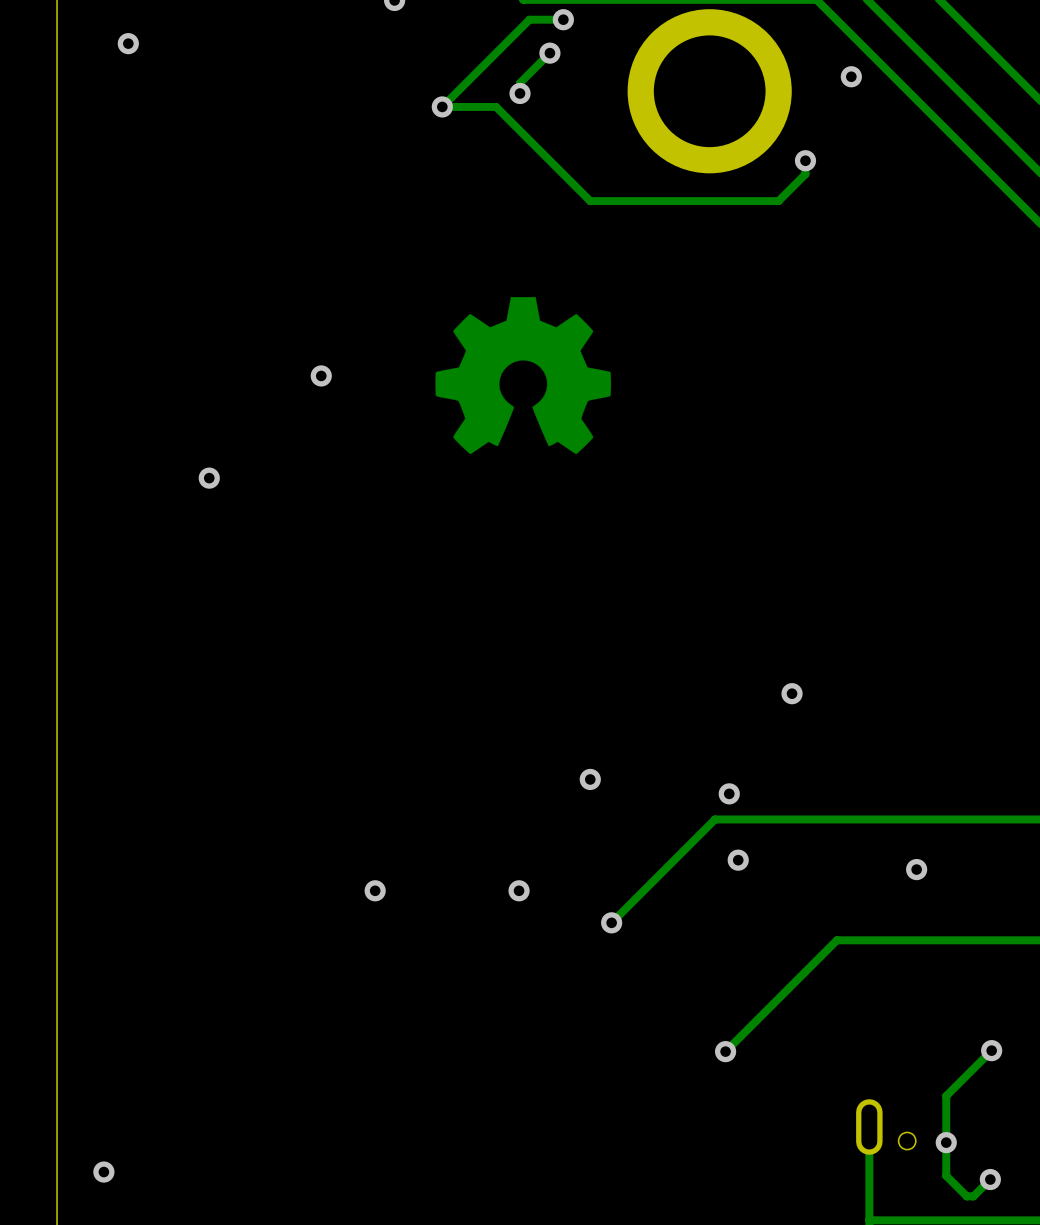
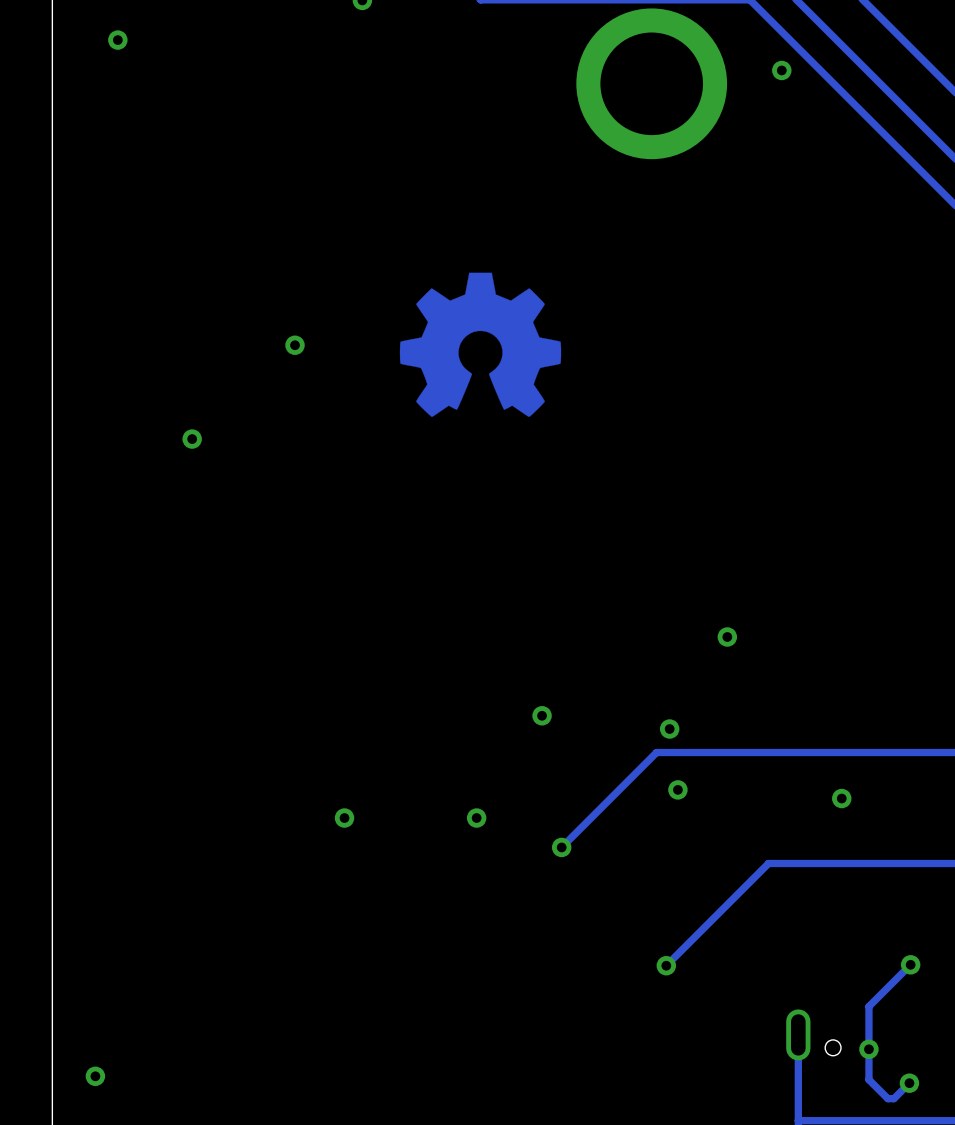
track: (563, 19) (529, 19) (442, 106) (496, 106) (590, 201) (778, 201) (805, 174) (805, 160) -> none
via: (563, 19) -> none
track: (549, 53) (520, 83) (520, 93) -> none
via: (549, 53) -> none
via: (520, 93) -> none
via: (442, 106) -> none
via: (805, 160) -> none

